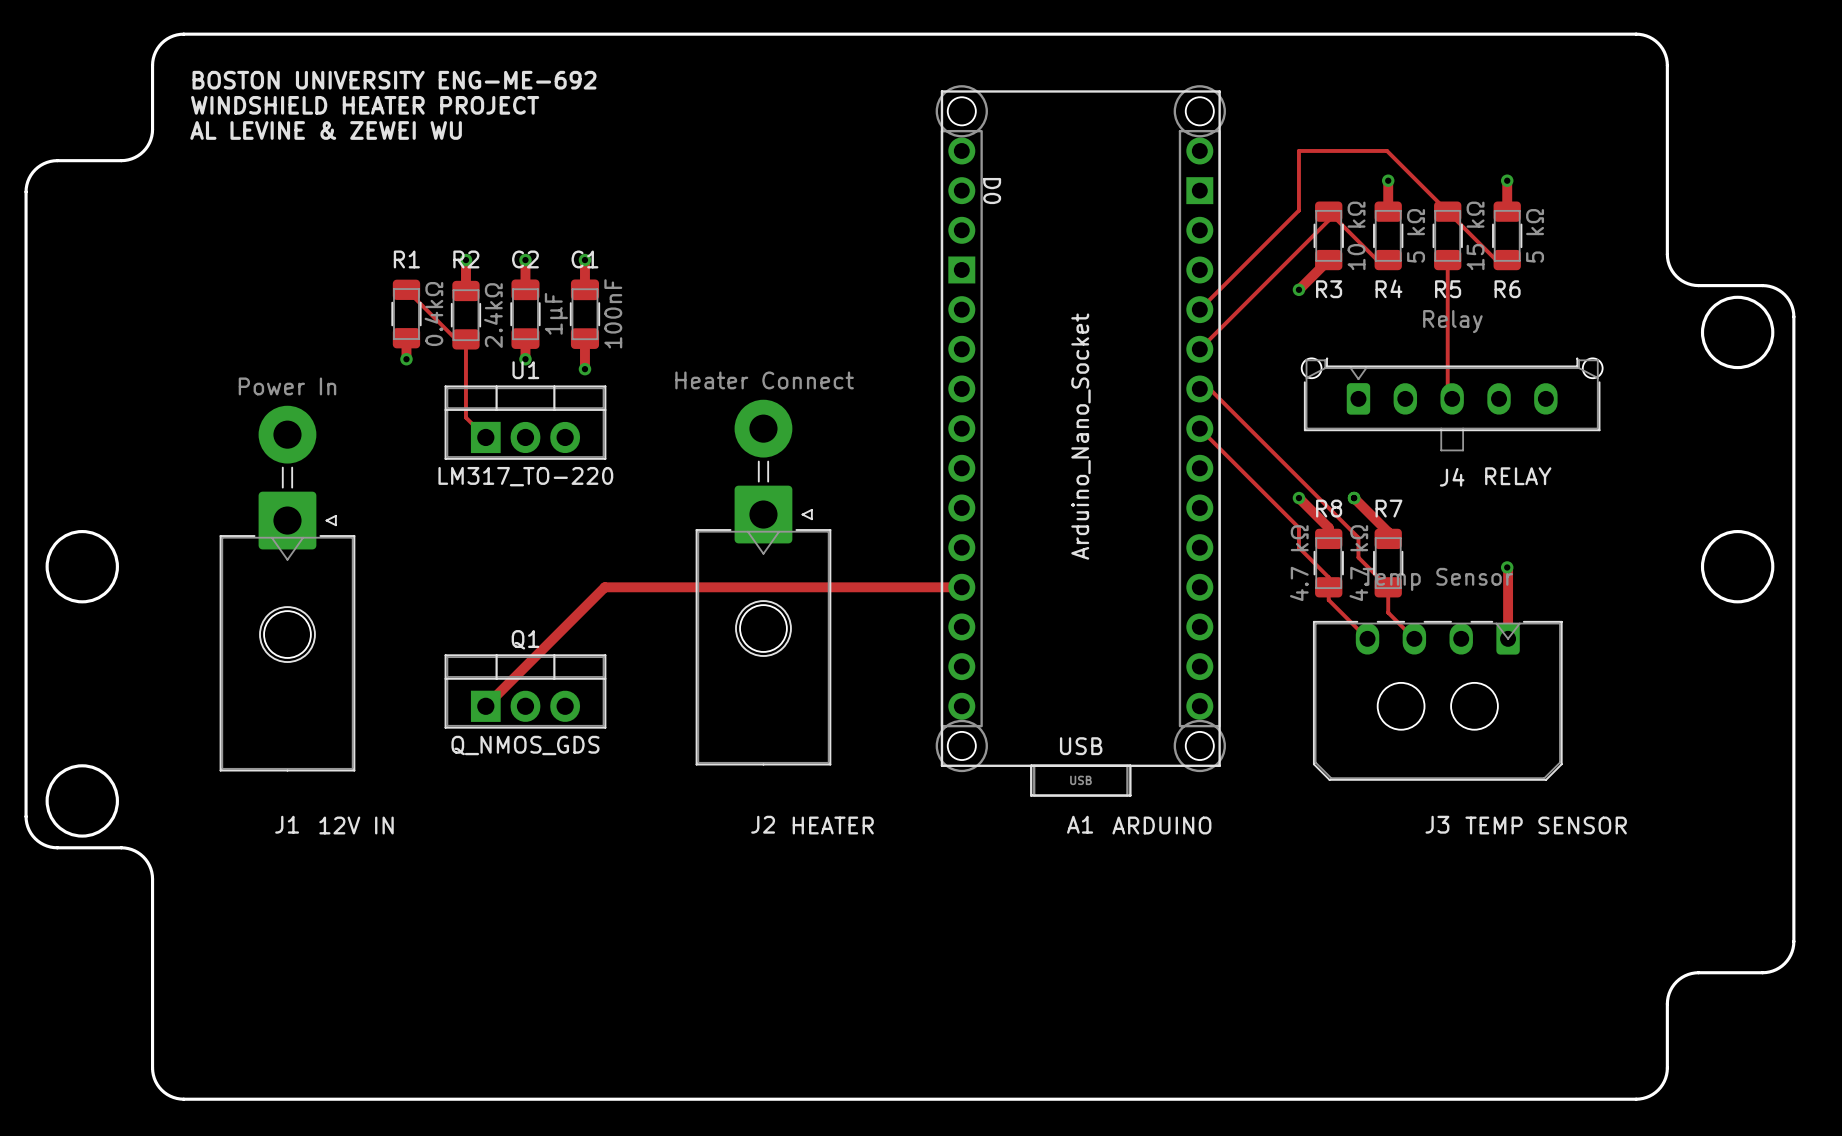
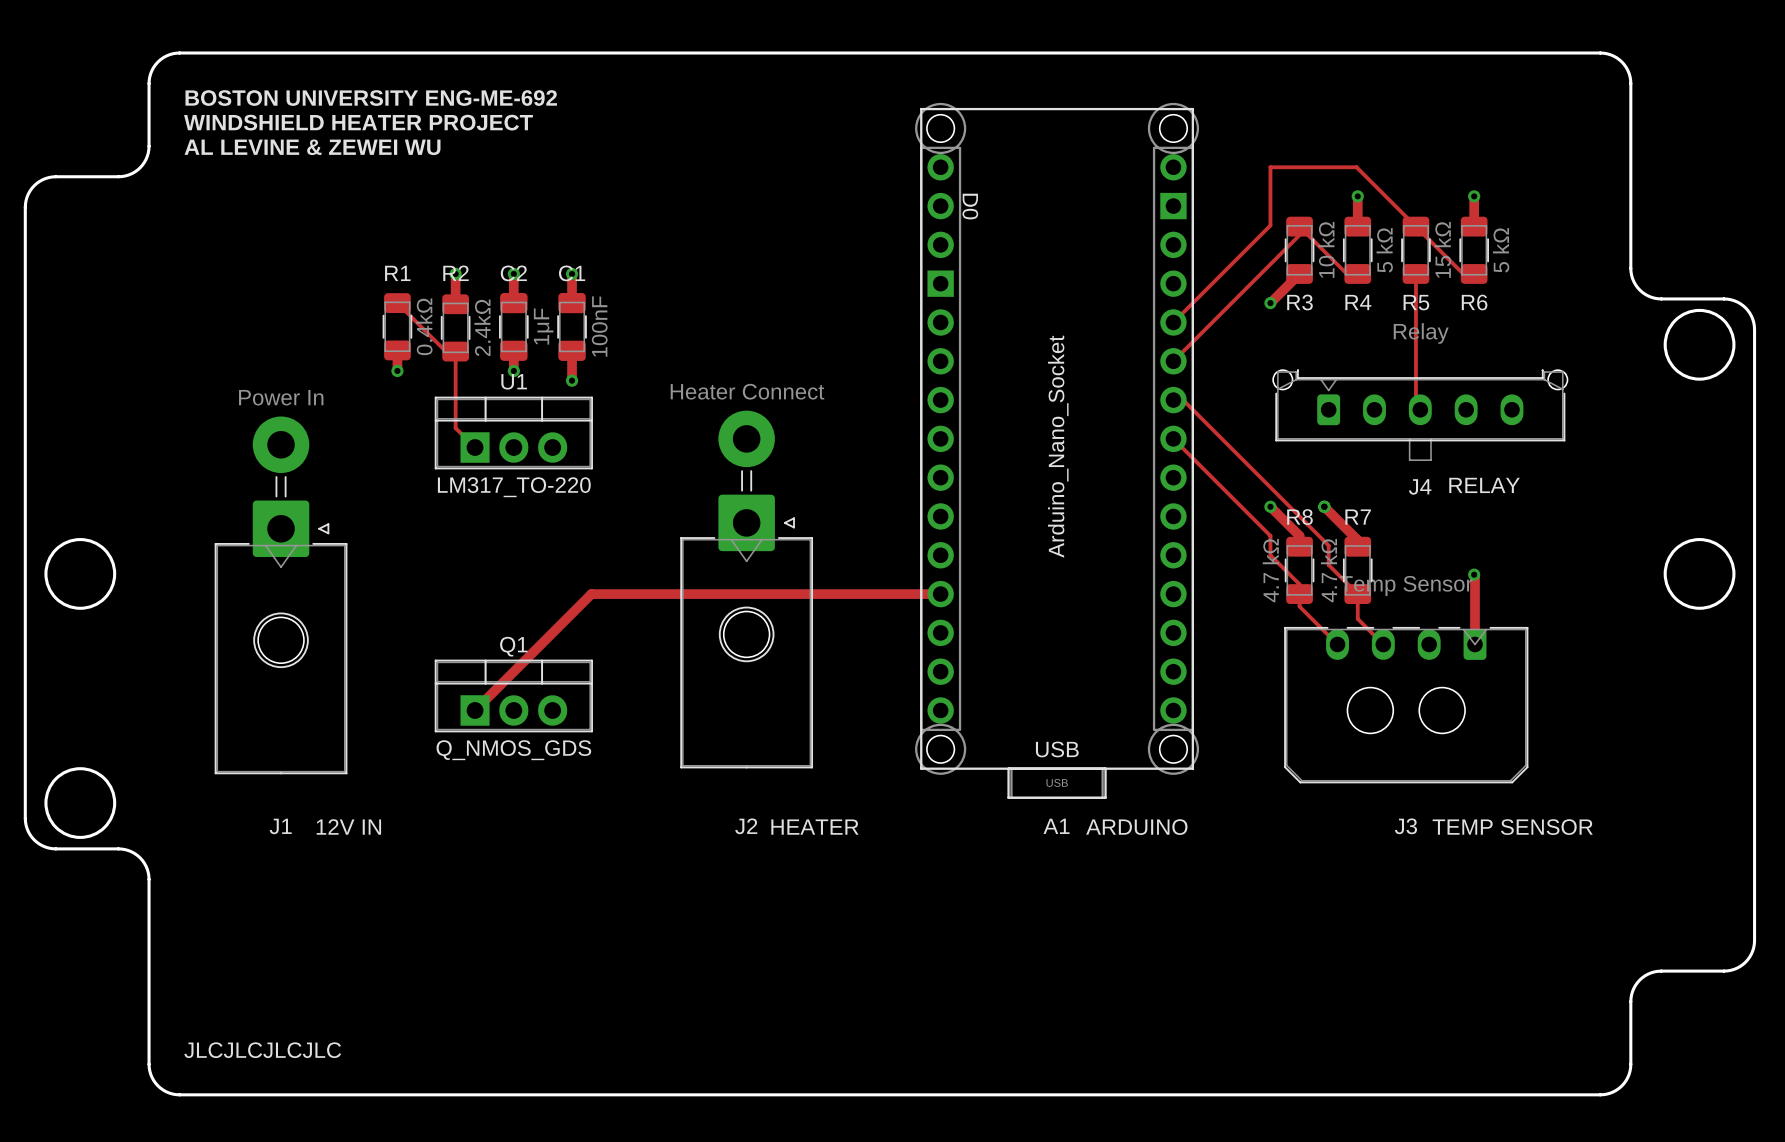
text: none -> JLCJLCJLCJLC (262, 1050)

